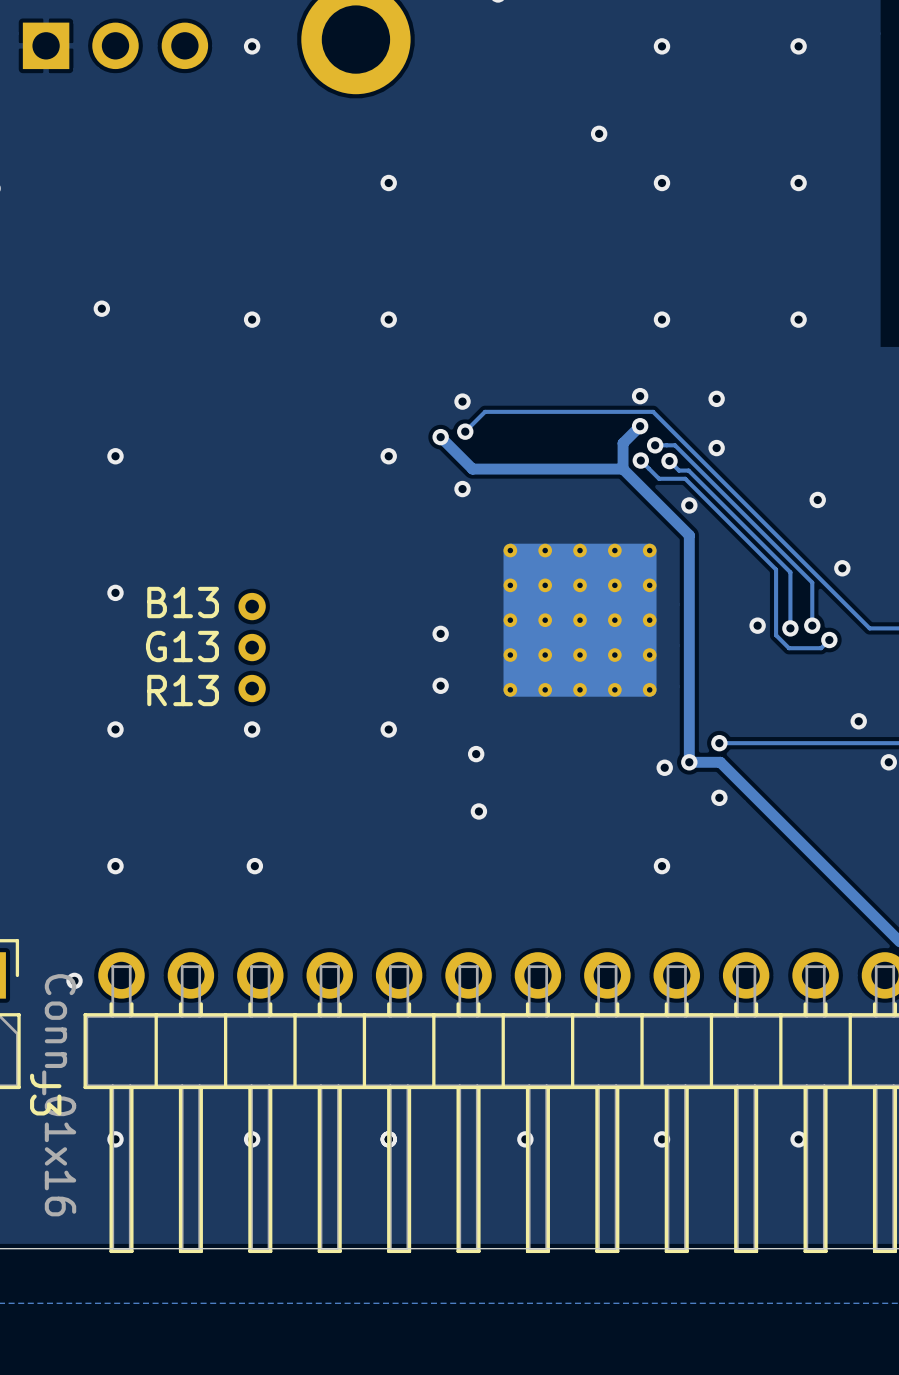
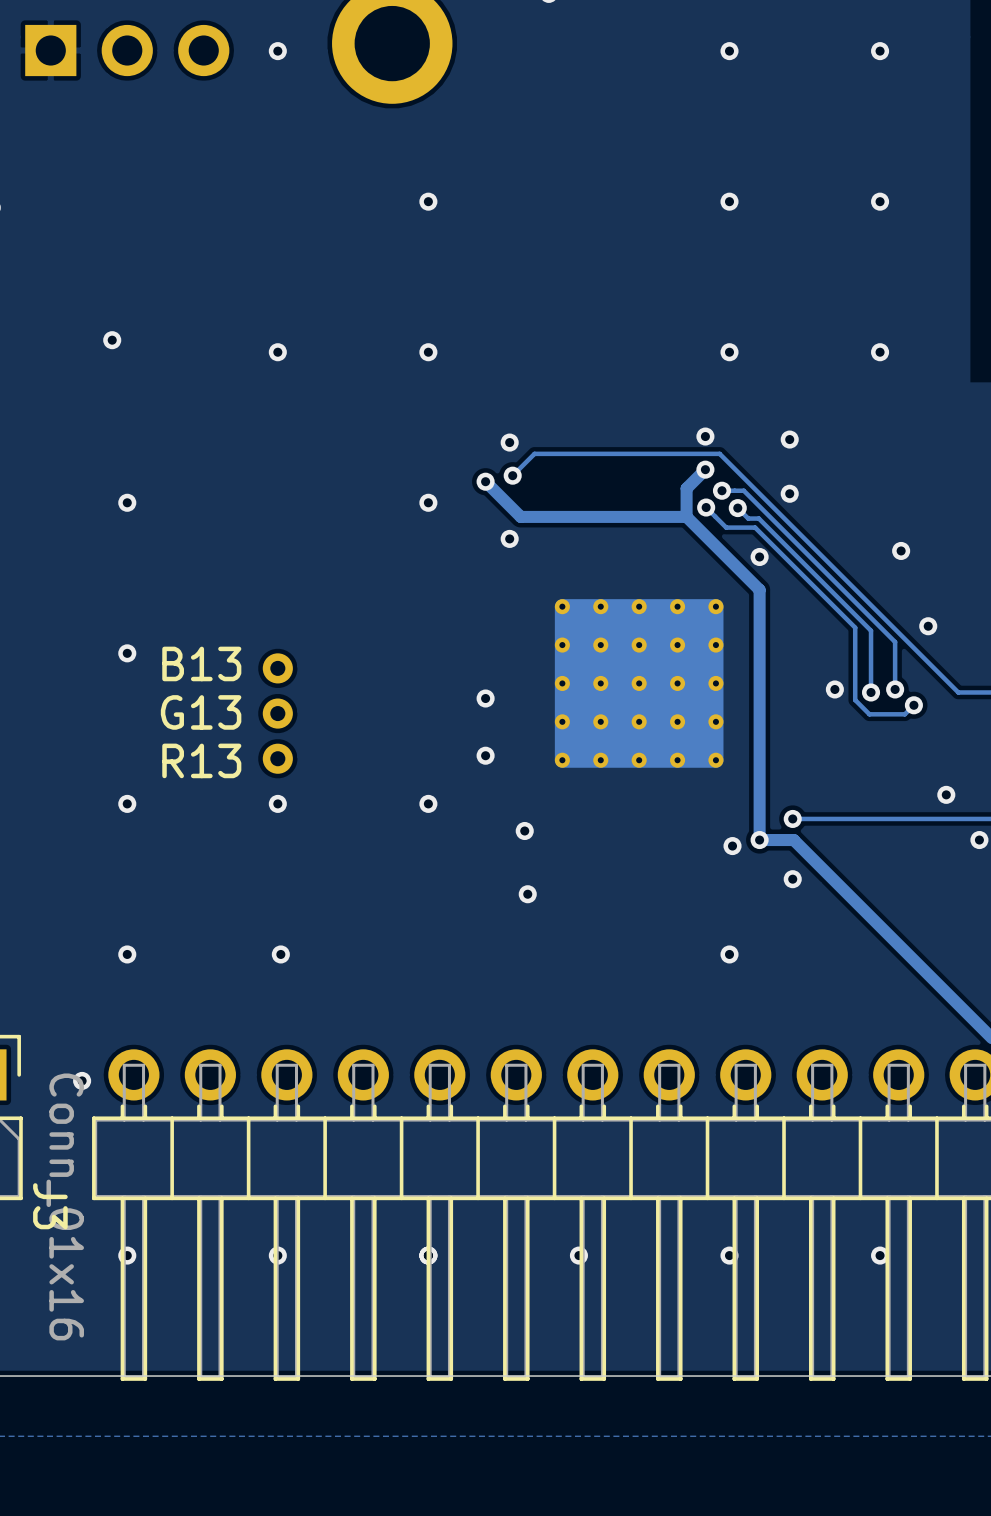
via: (599, 133) -> none

